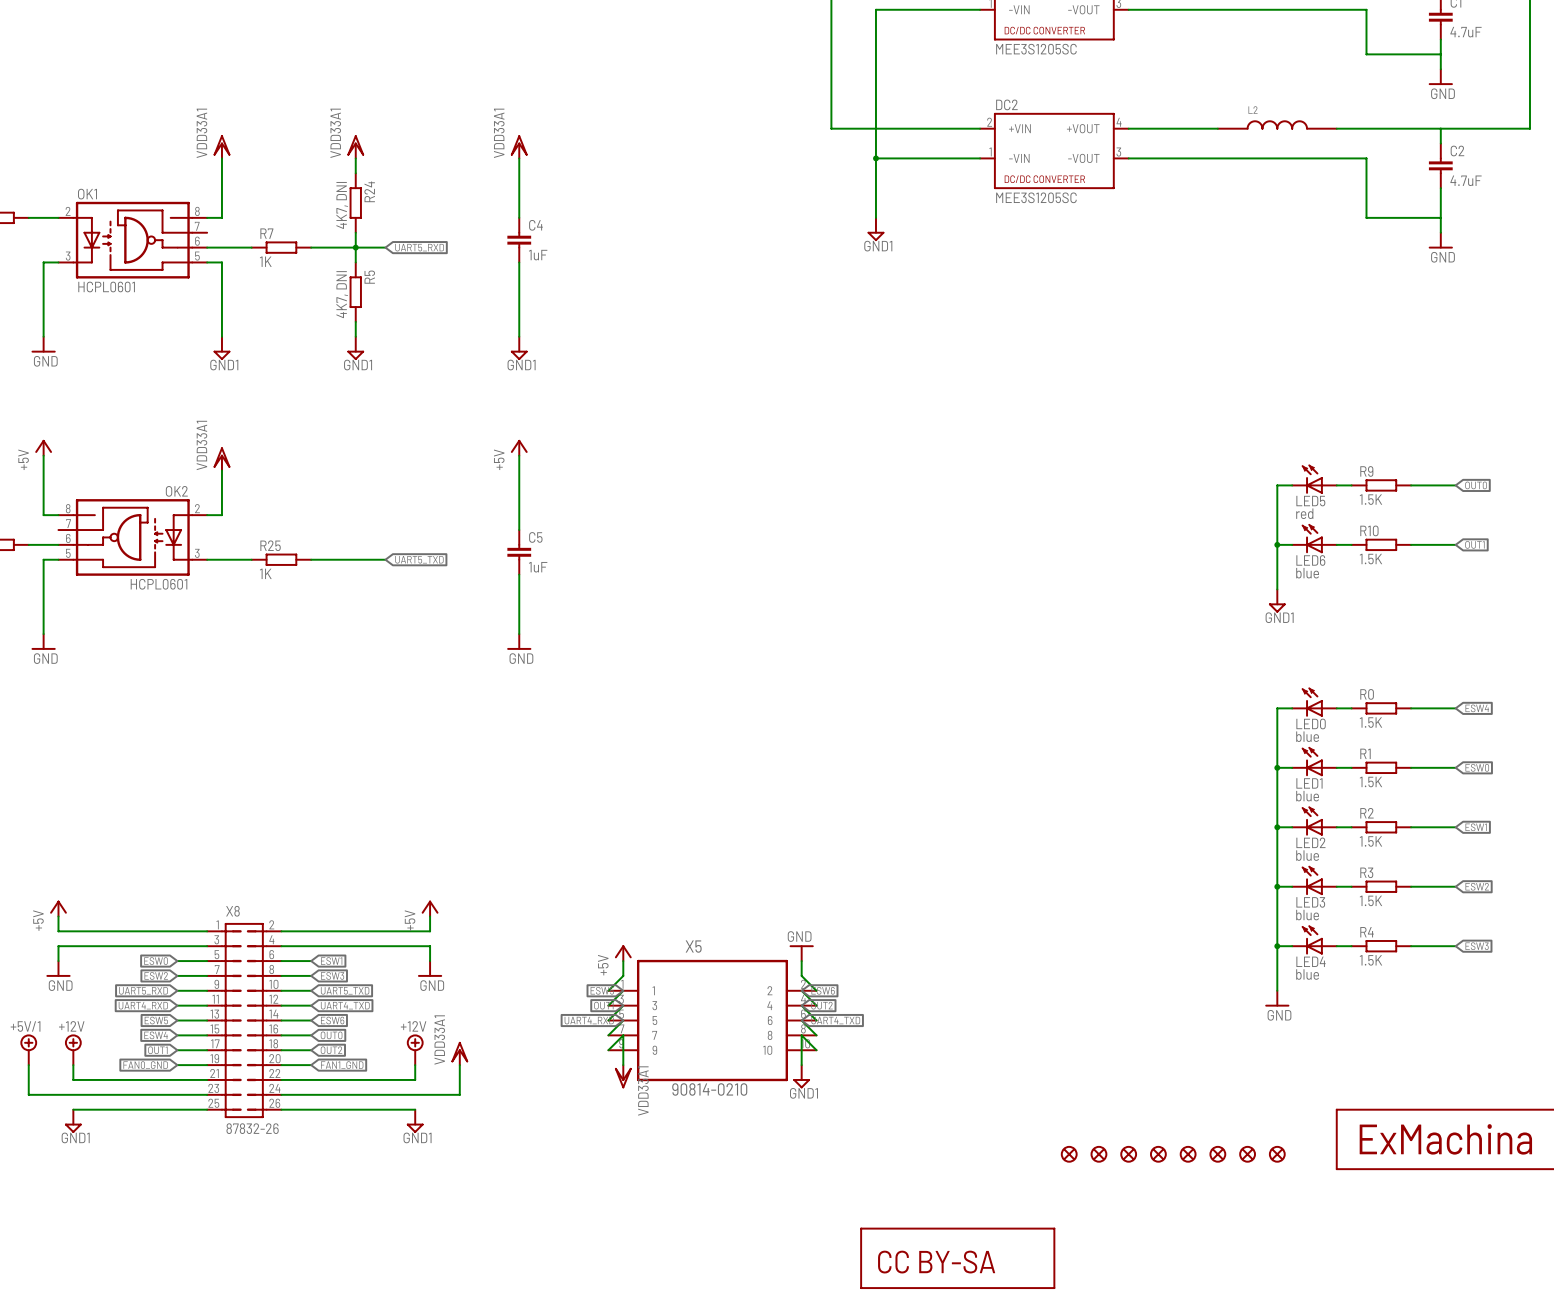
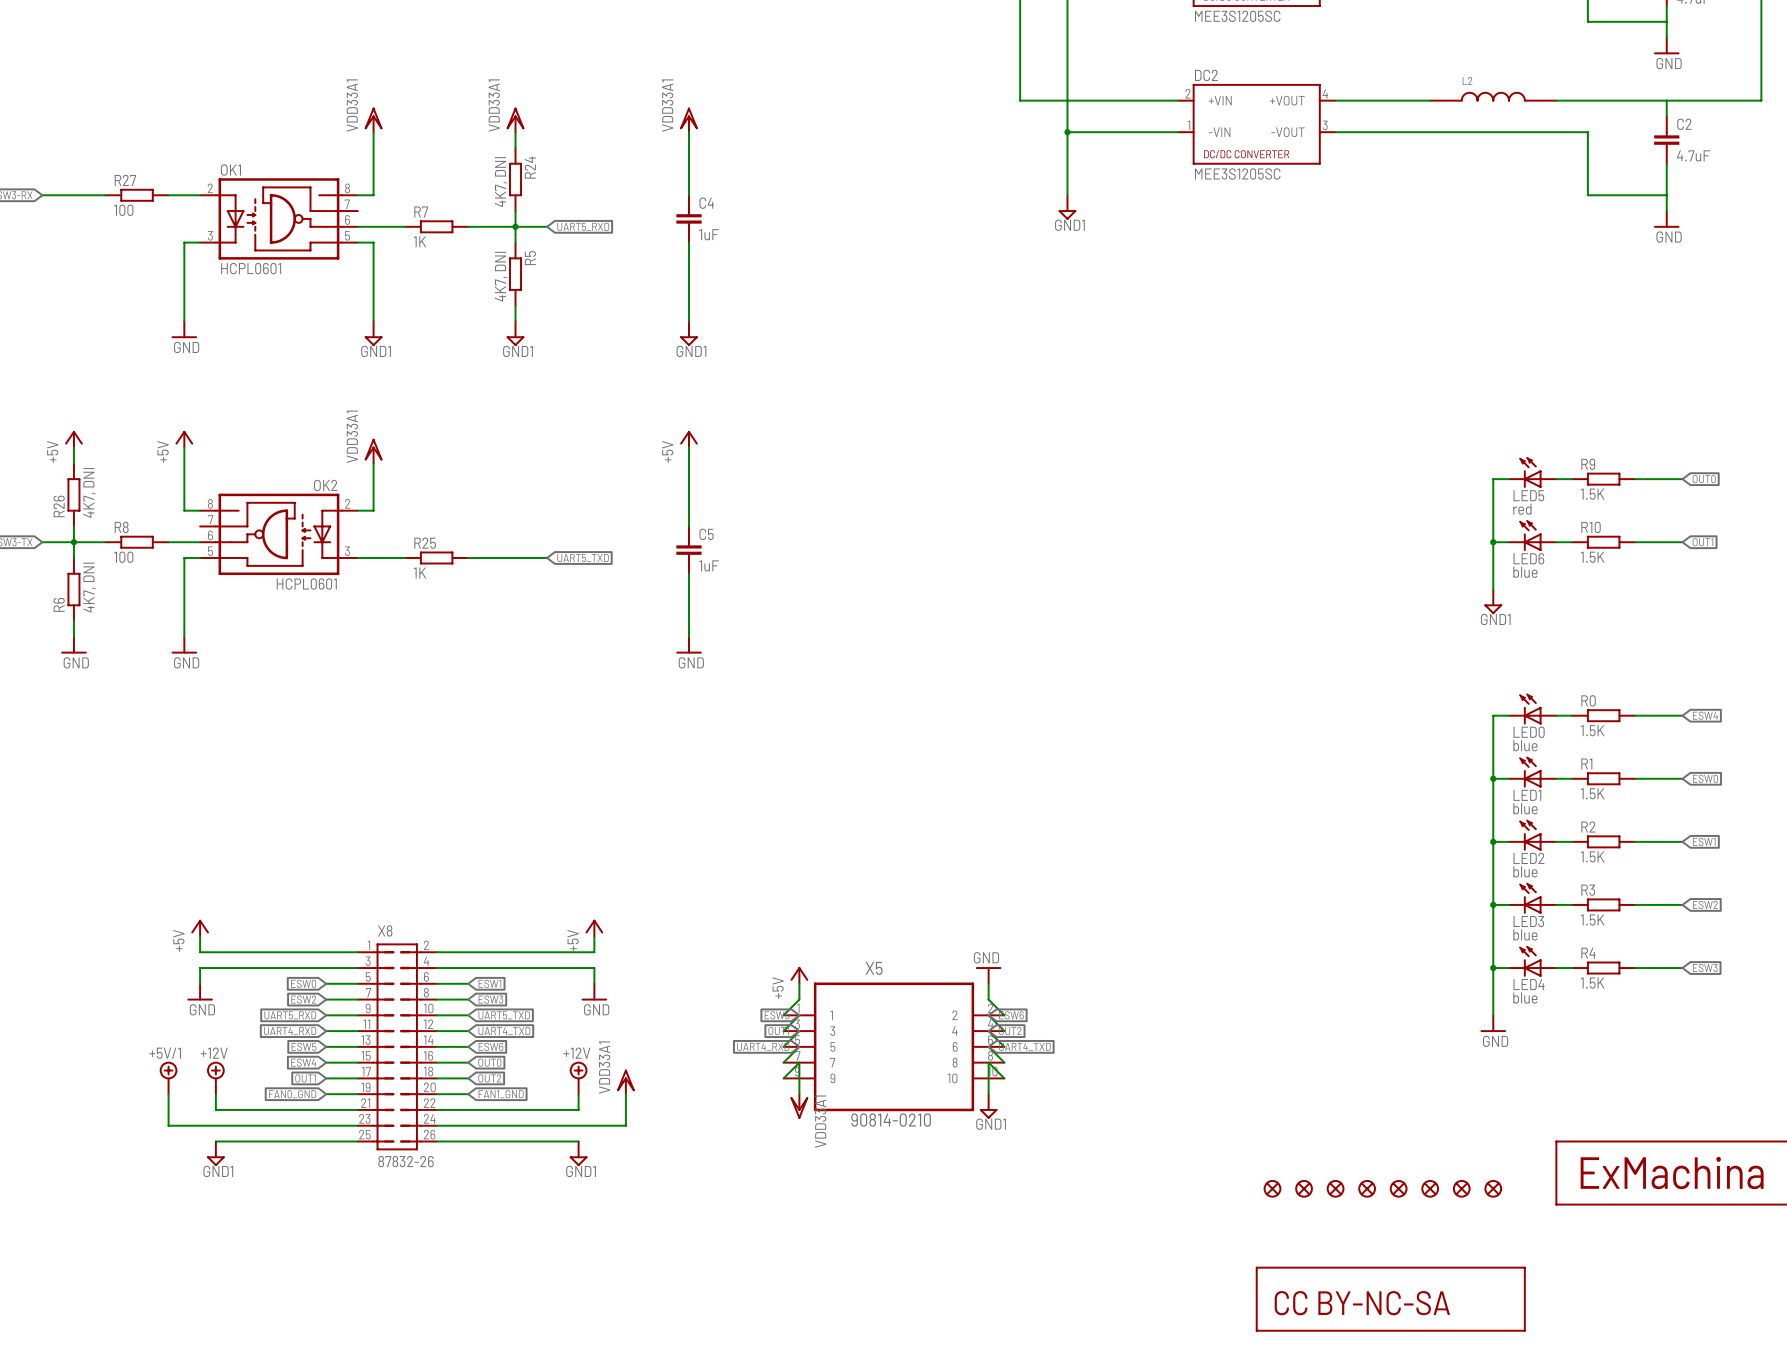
part: (957, 1258) -> none
part: none -> (1390, 1299)

